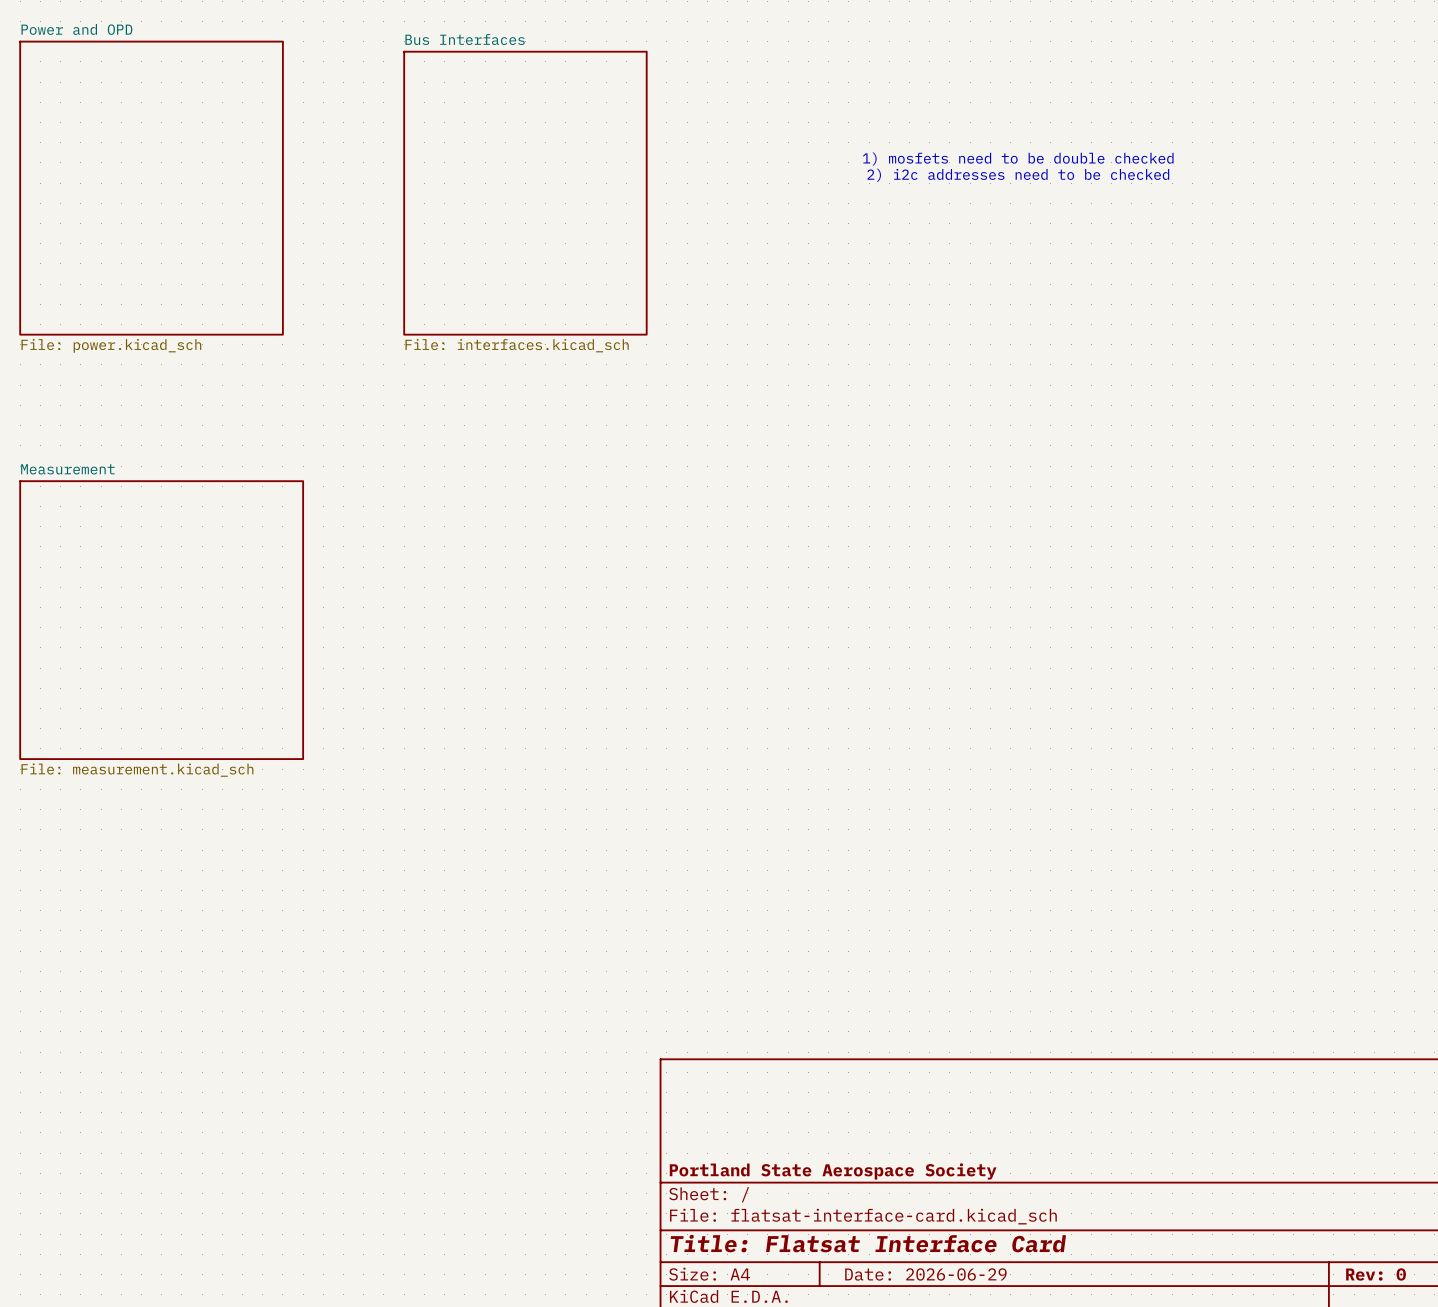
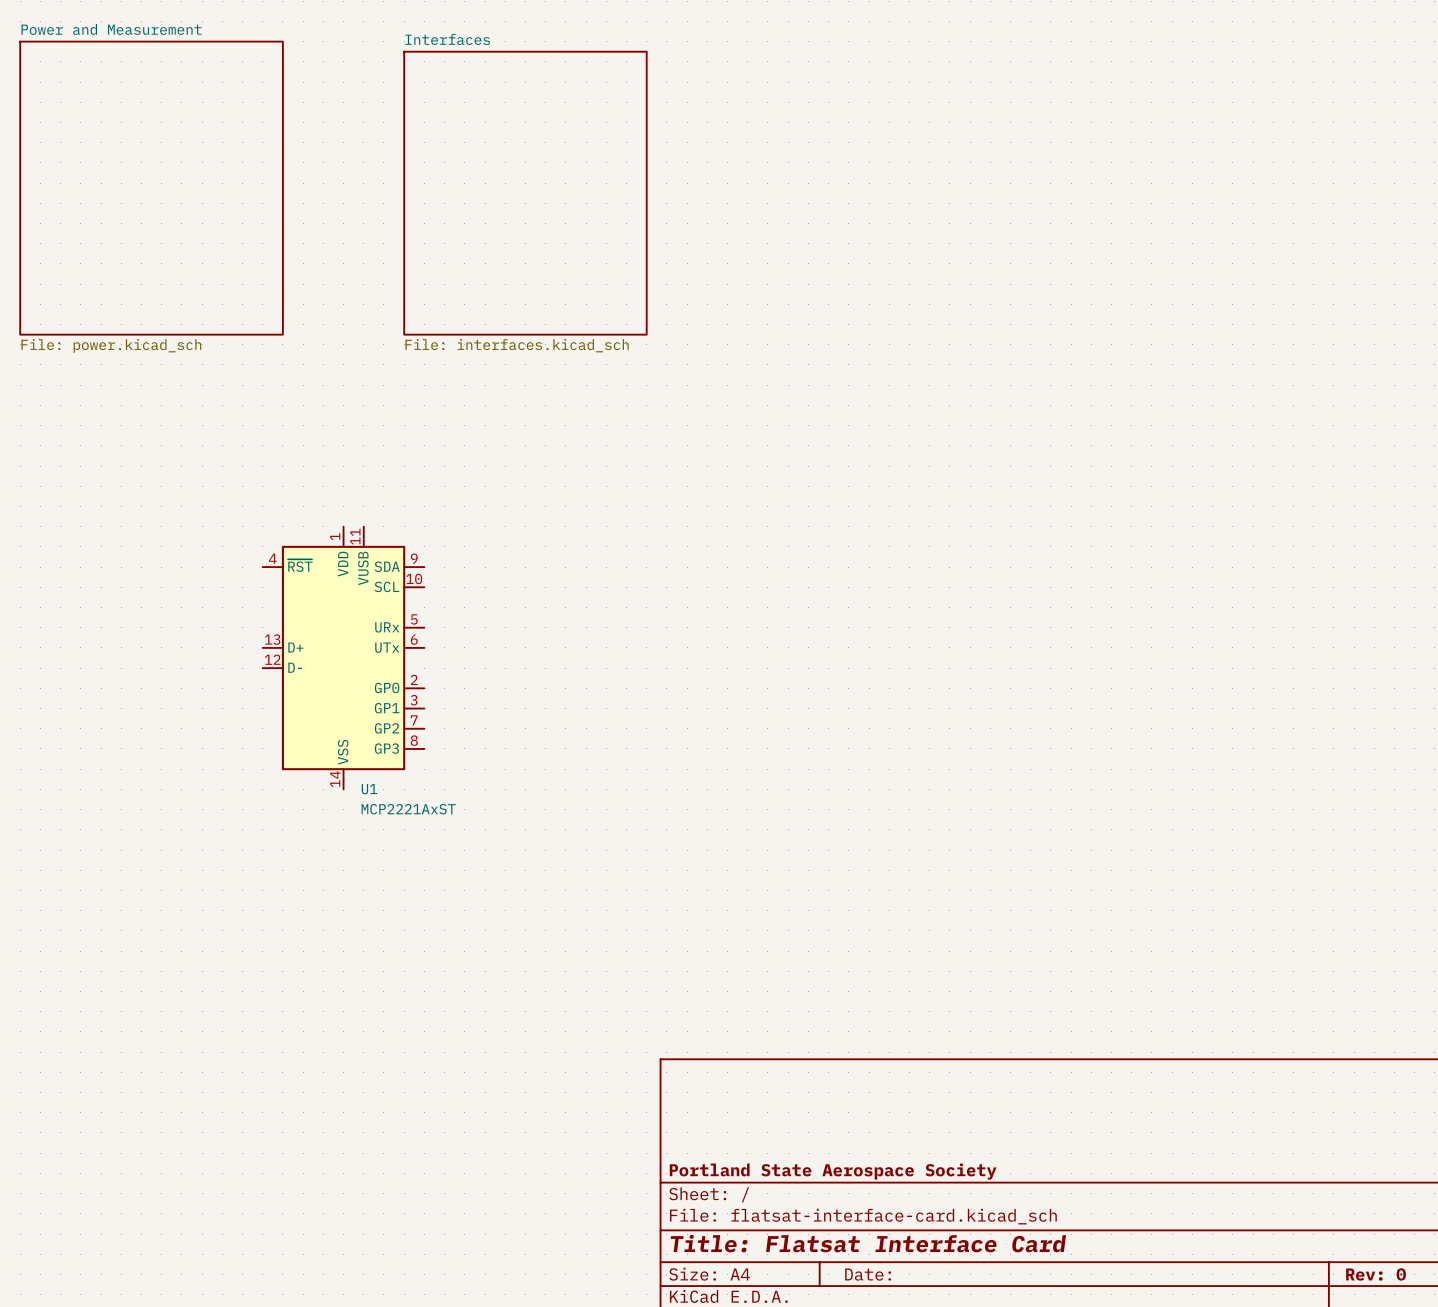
sheet Power and OPD name: Power and OPD (76, 29) -> Power and Measurement (111, 29)
sheet Bus Interfaces name: Bus Interfaces (465, 39) -> Interfaces (447, 39)
text: 1) mosfets need to be double checked (1018, 158) -> none
text: 2) i2c addresses need to be checked (1018, 175) -> none
sheet Measurement: File: measurement.kicad_sch (161, 620) -> none
U1: none -> MCP2221AxST (343, 658)
title block: Date: 2026-06-29 (925, 1274) -> Date: (868, 1274)

